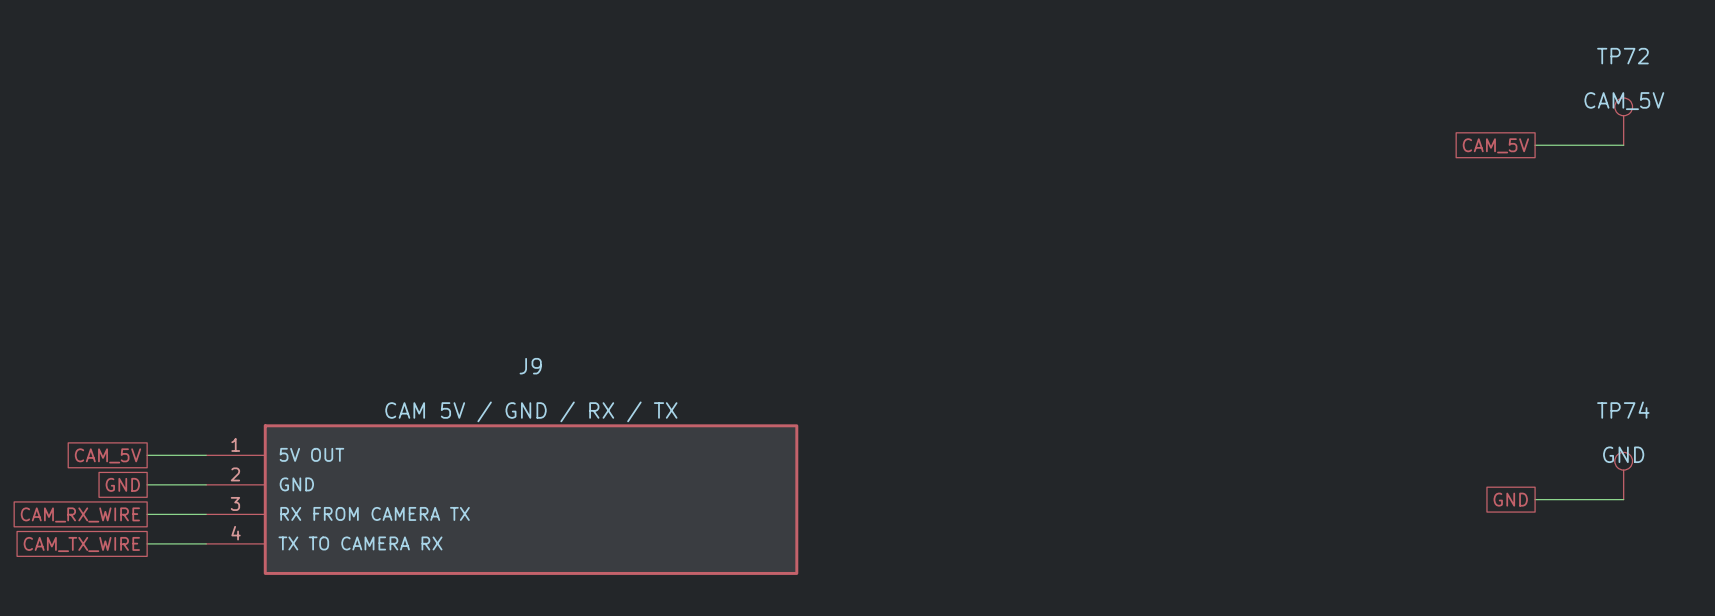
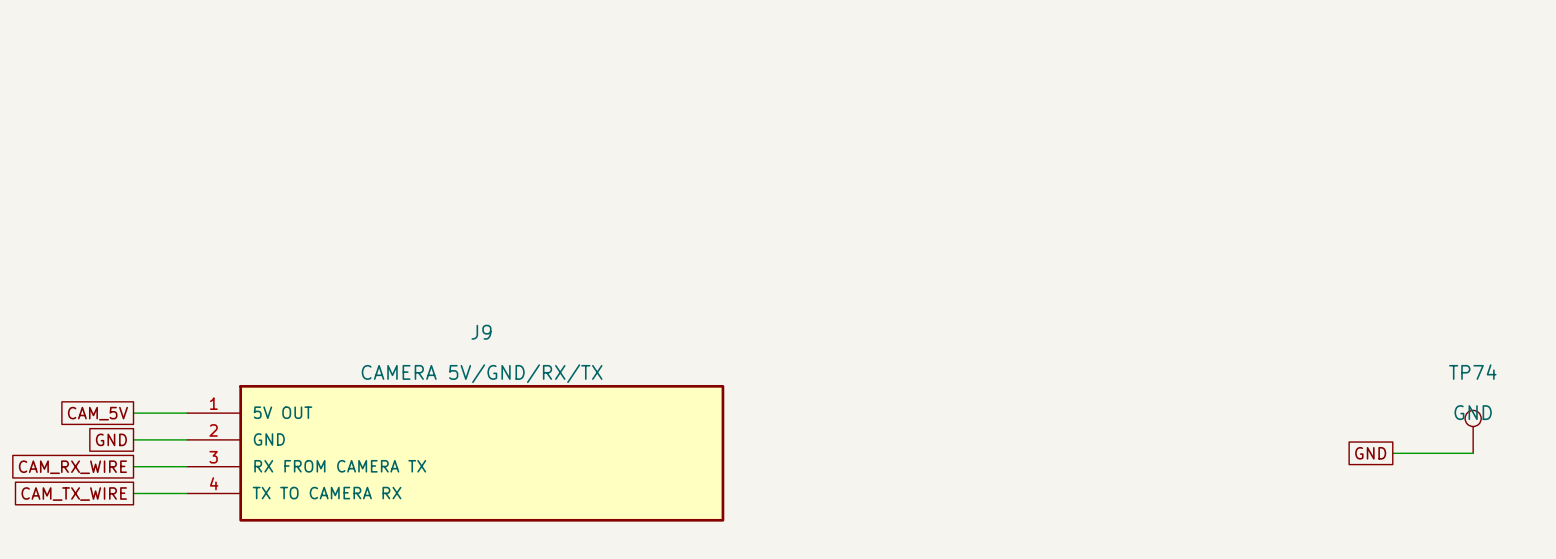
TP72: CAM_5V (1623, 121) -> none
global label: CAM_5V (1495, 145) -> none
wire: (1535, 145) (1623, 145) -> none
J9 value: CAM 5V / GND / RX / TX (531, 411) -> CAMERA 5V/GND/RX/TX (482, 373)

